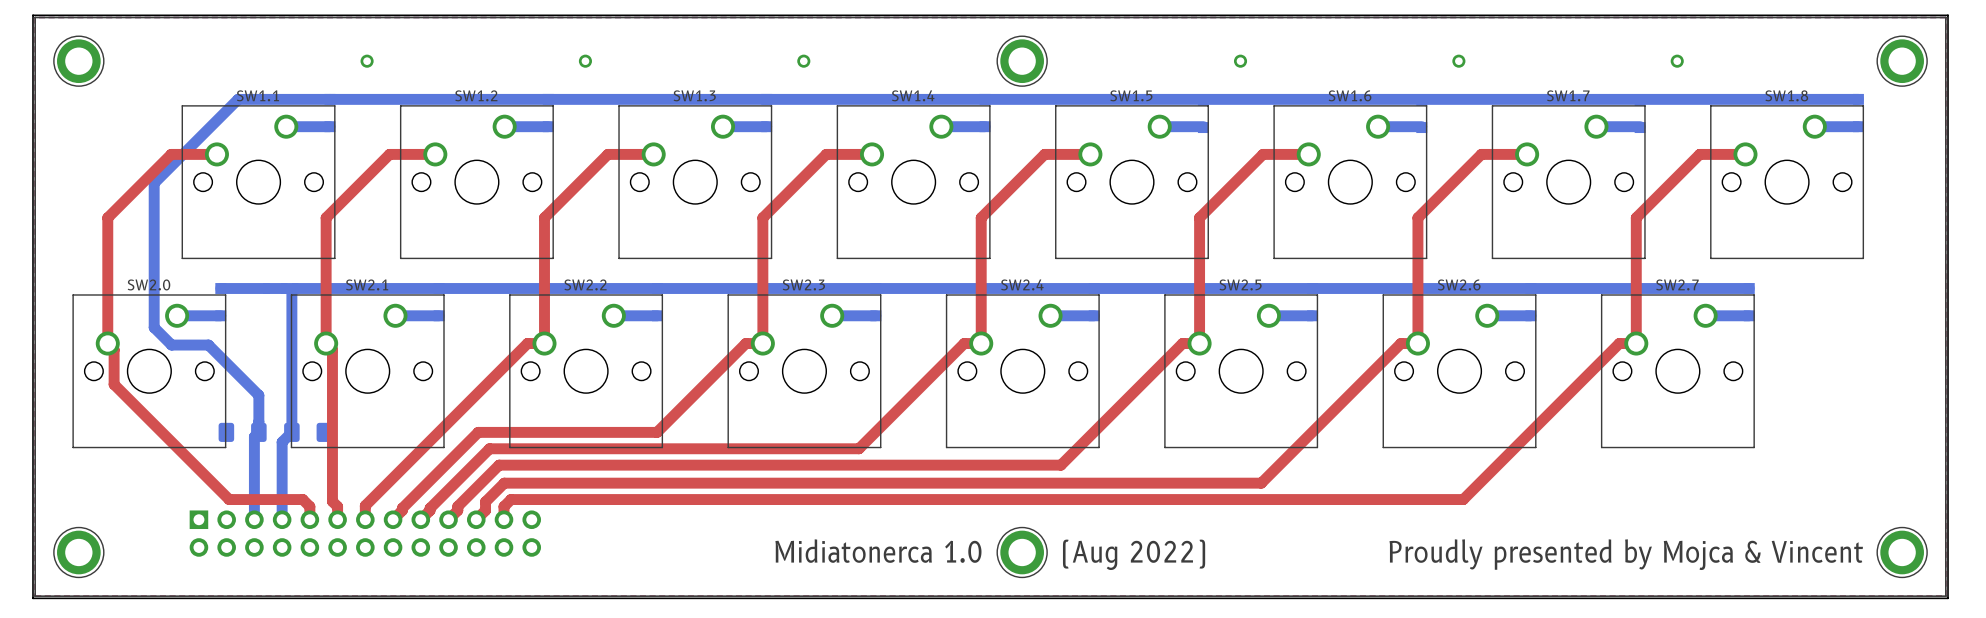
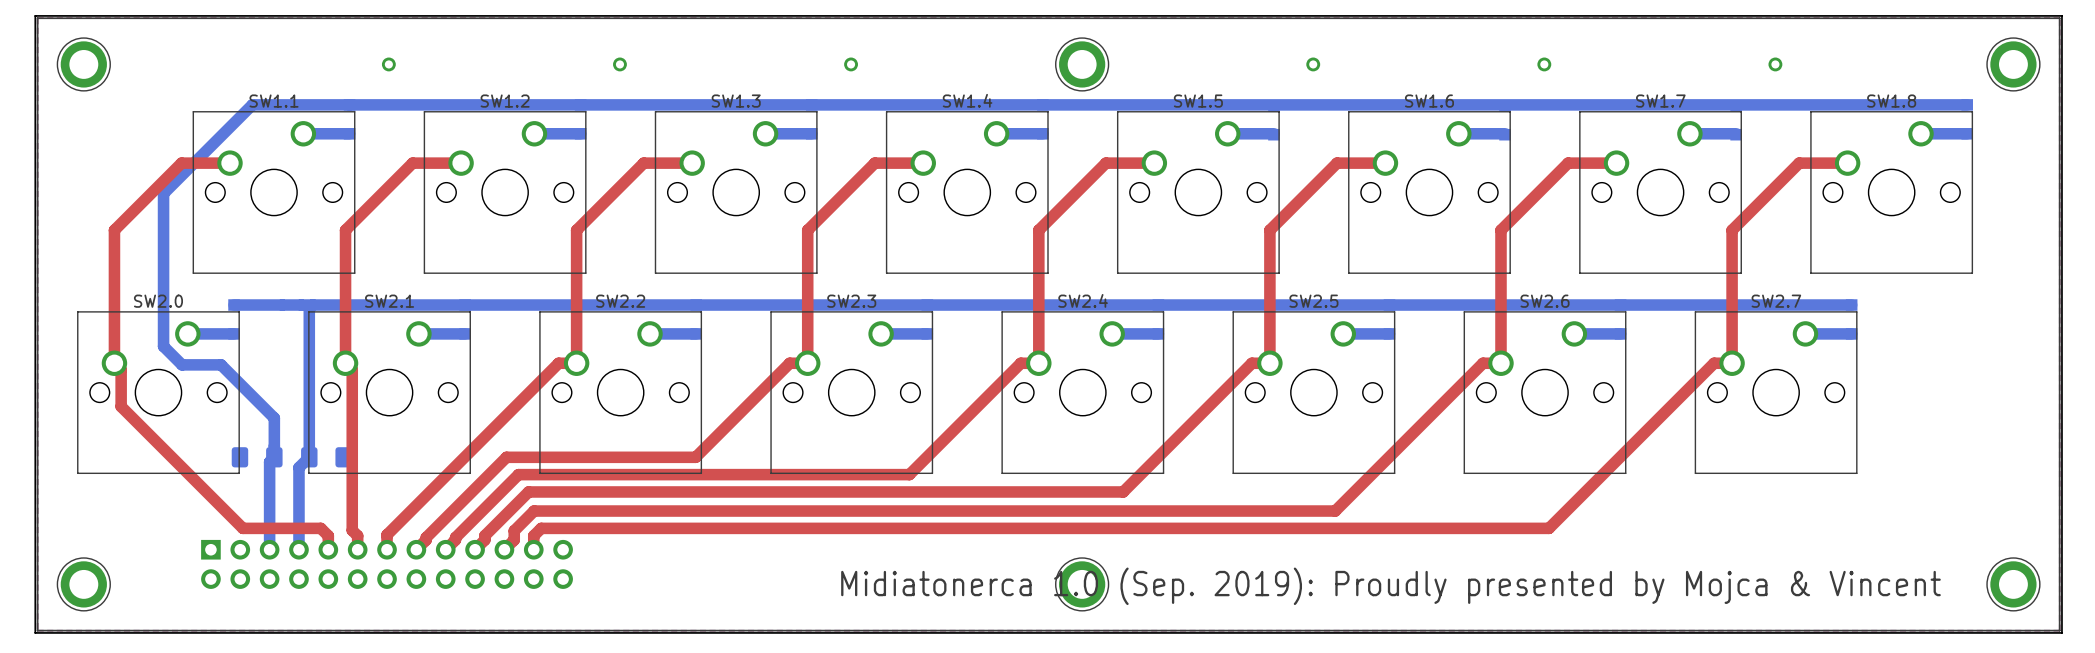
text: Midiatonerca 1.0 (878, 551) -> none
text: (Aug 2022) (1134, 554) -> none
text: none -> Midiatonerca 1.0 (Sep. 2019): Proudly presented by Mojca & Vincent (1390, 586)
text: Proudly presented by Mojca & Vincent (1626, 554) -> none

